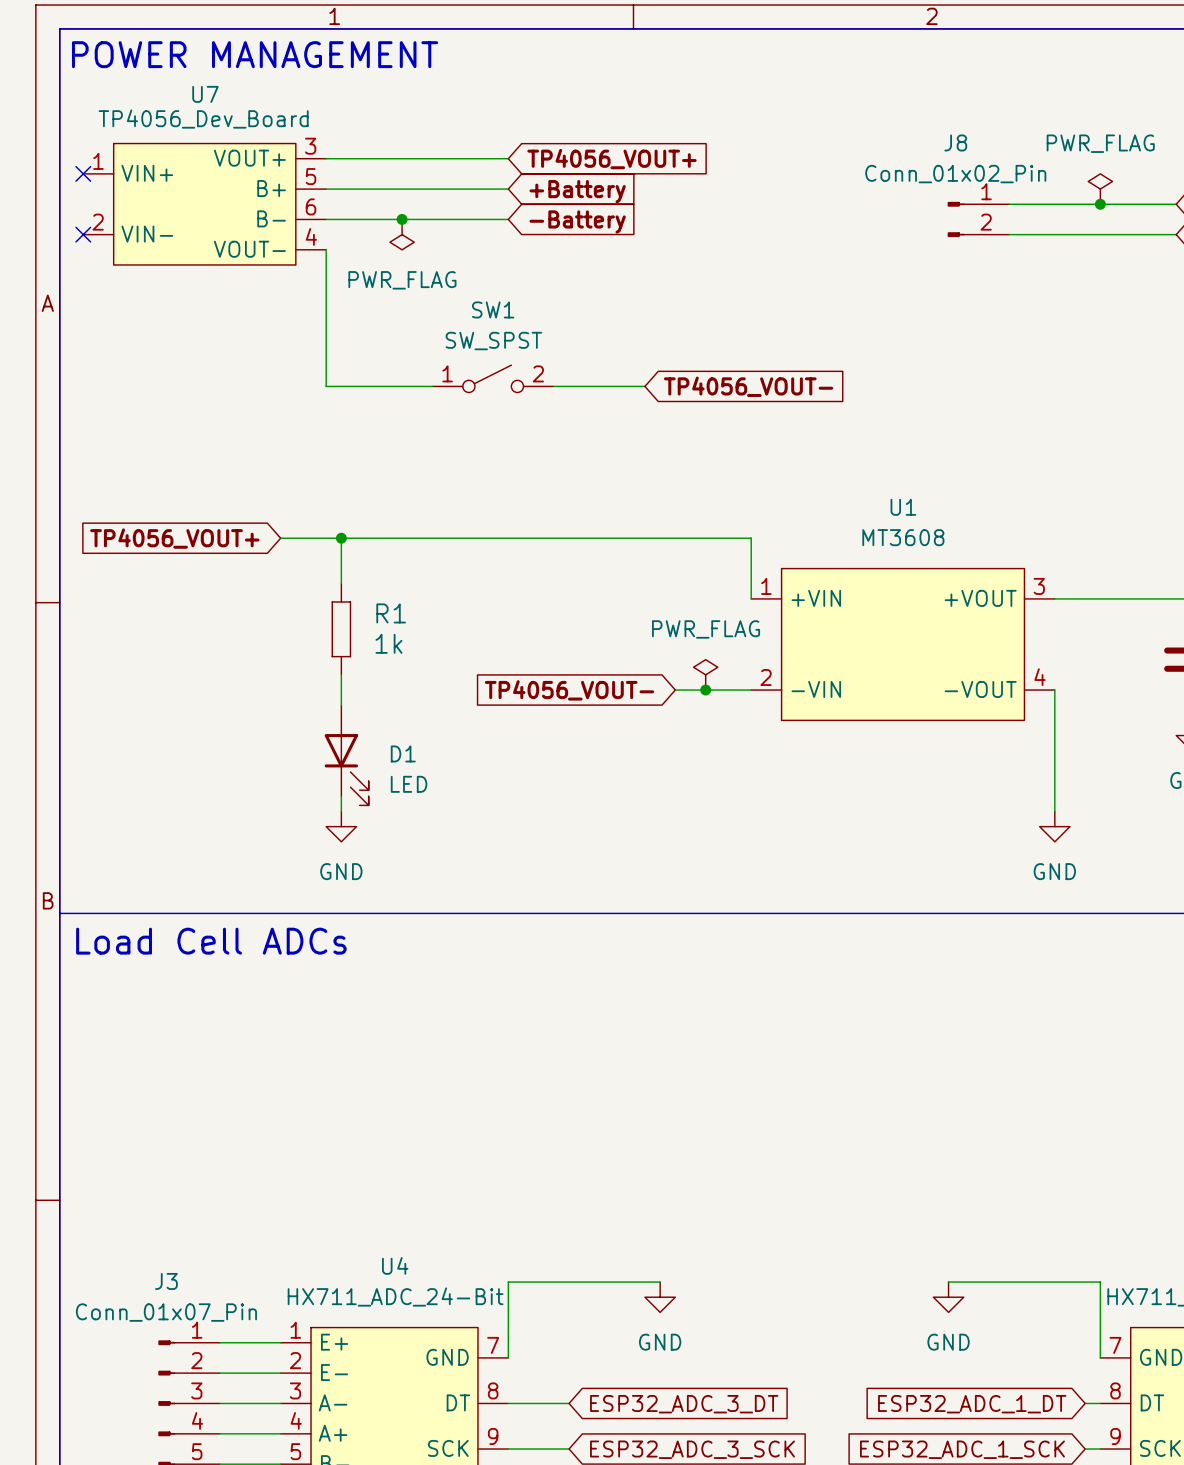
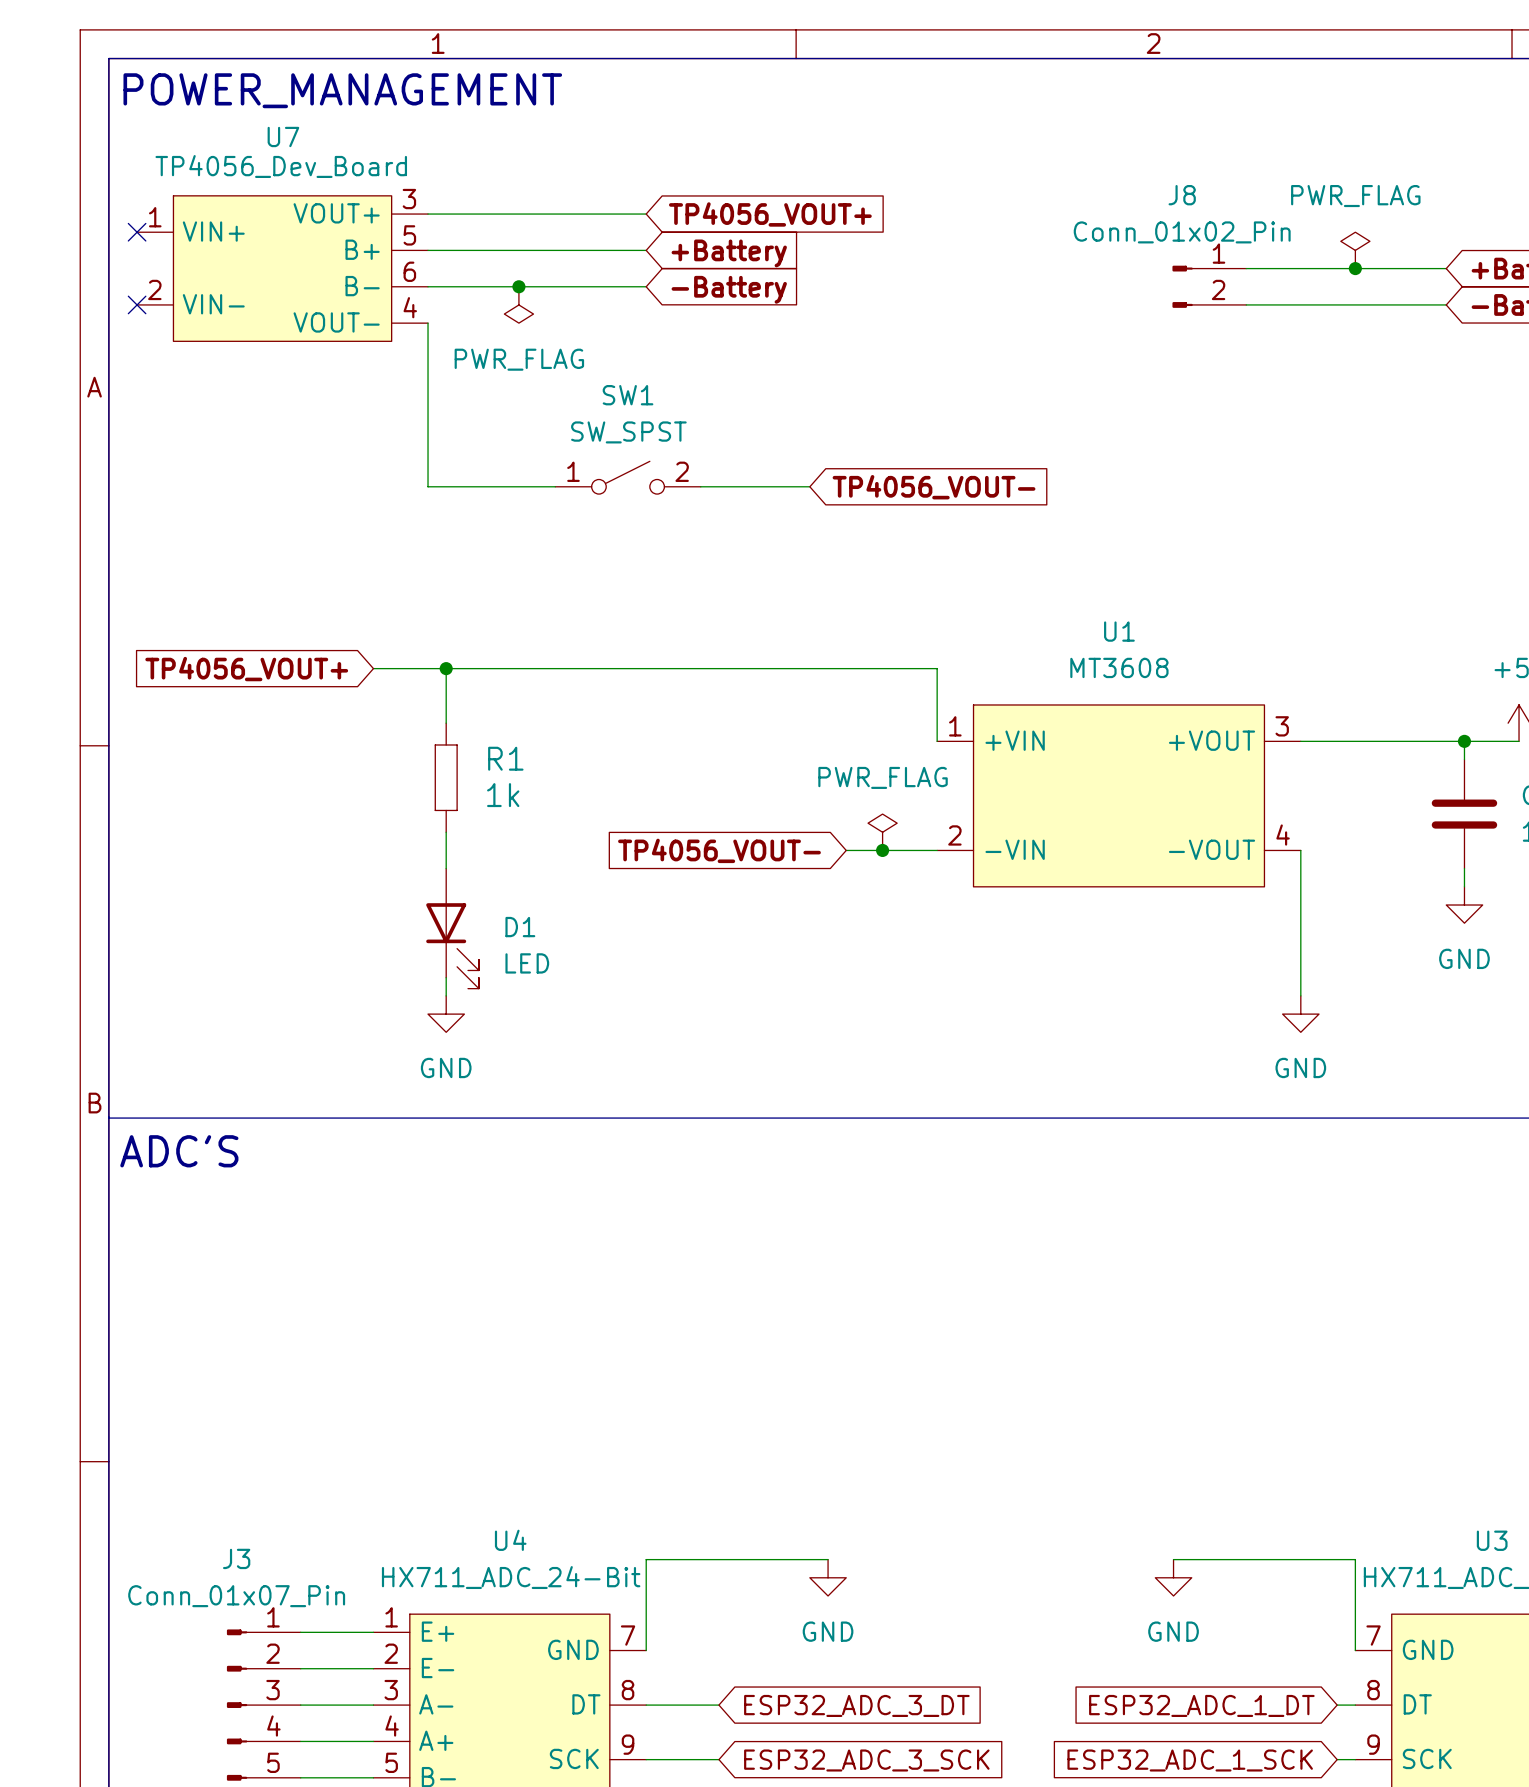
text: POWER MANAGEMENT (255, 54) -> POWER_MANAGEMENT (342, 90)
text: none -> ADC'S (179, 1151)
text: Load Cell ADCs (211, 941) -> none

